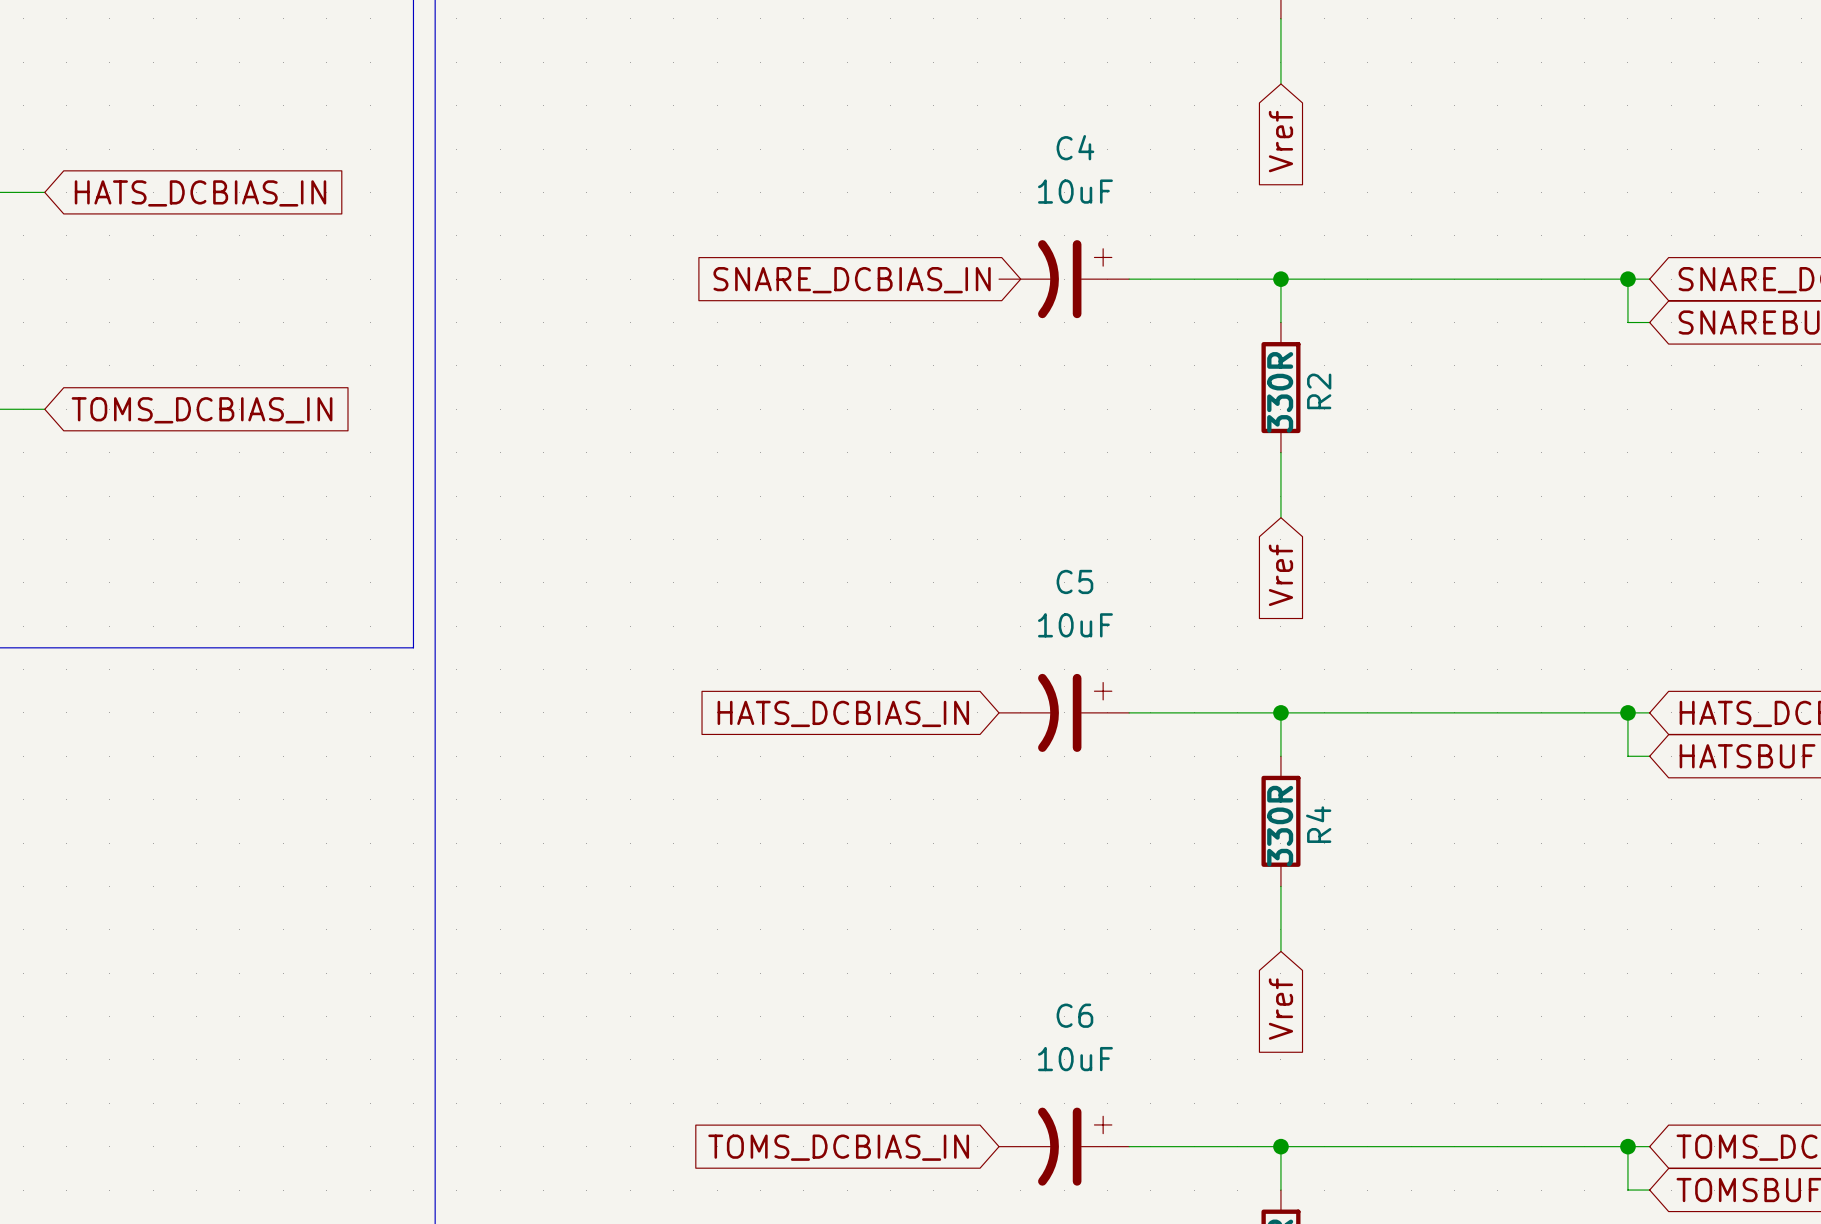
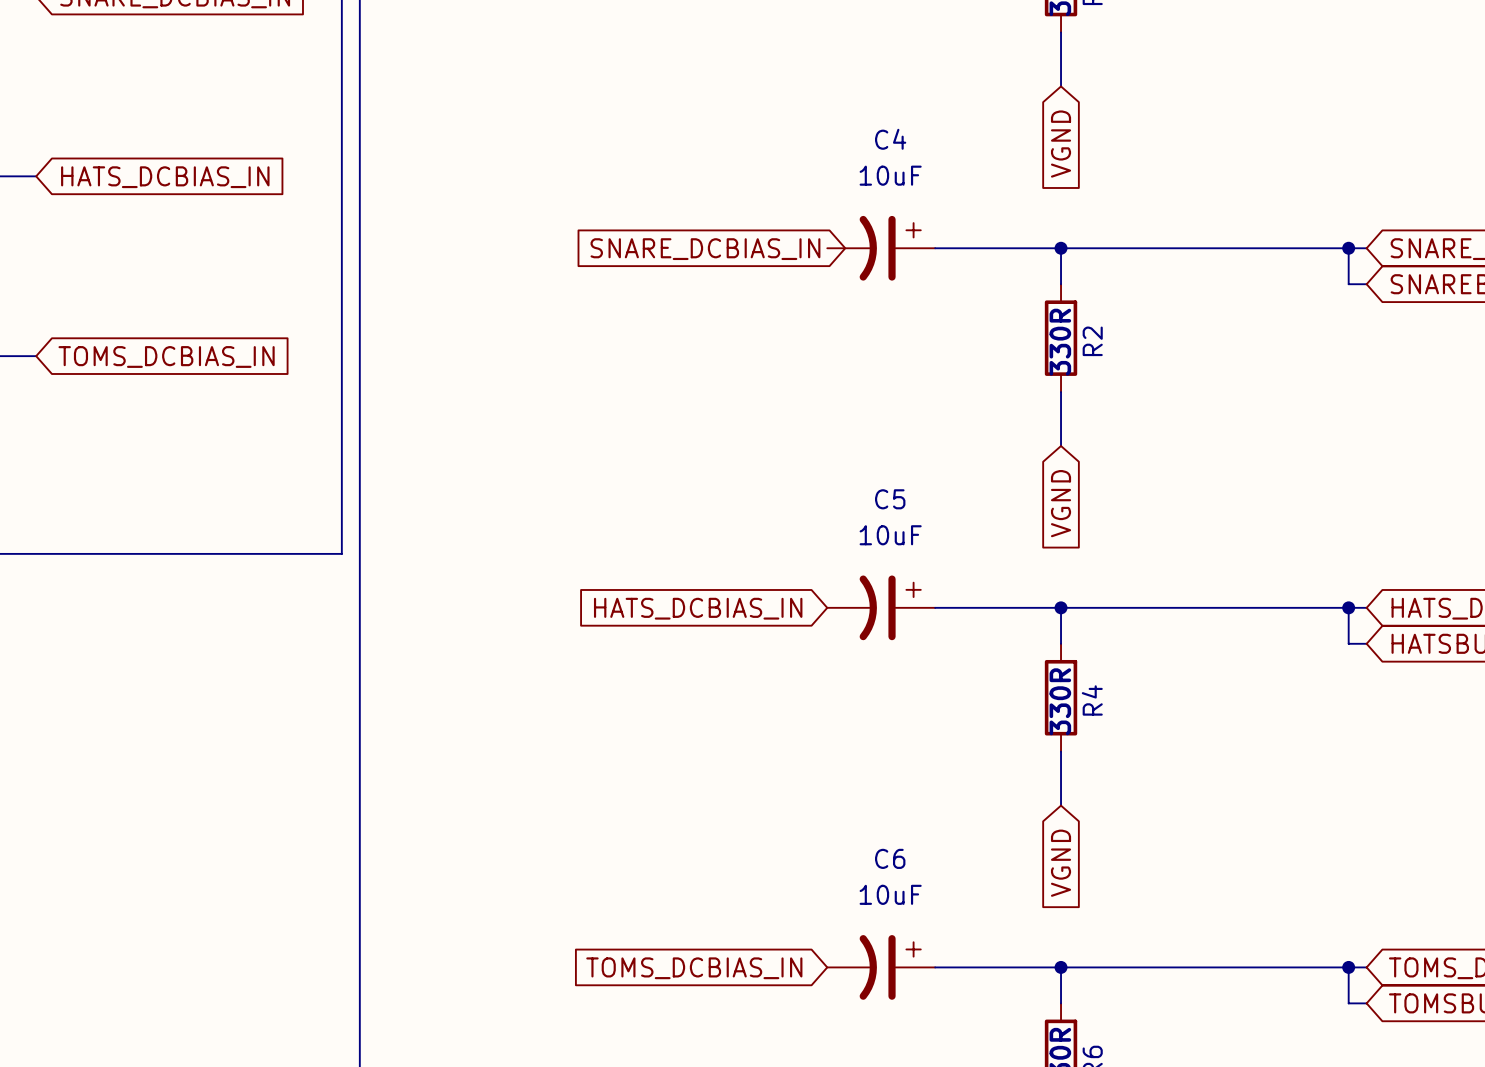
global label: Vref (1280, 141) -> VGND (1061, 144)
global label: Vref (1280, 575) -> VGND (1061, 503)
global label: Vref (1280, 1009) -> VGND (1061, 863)

